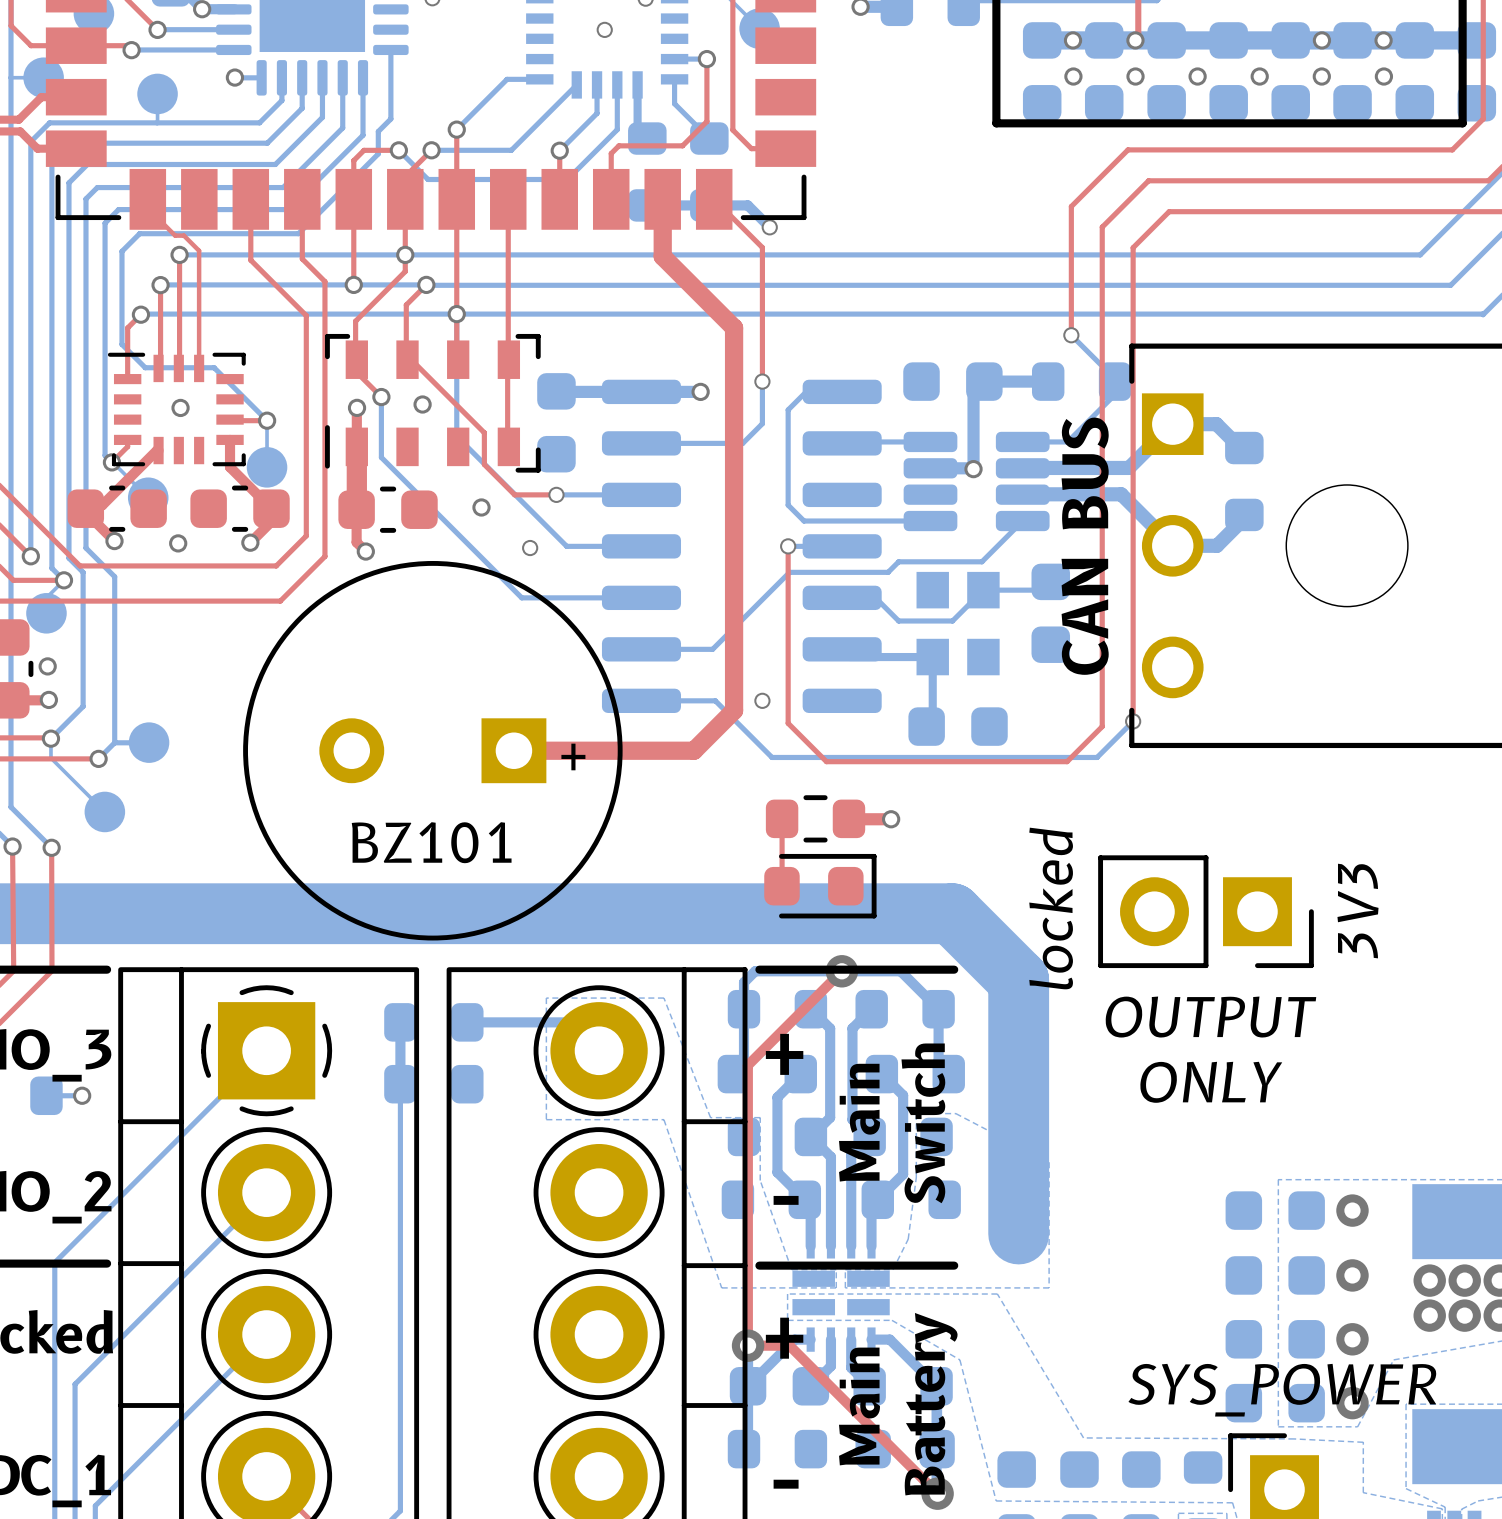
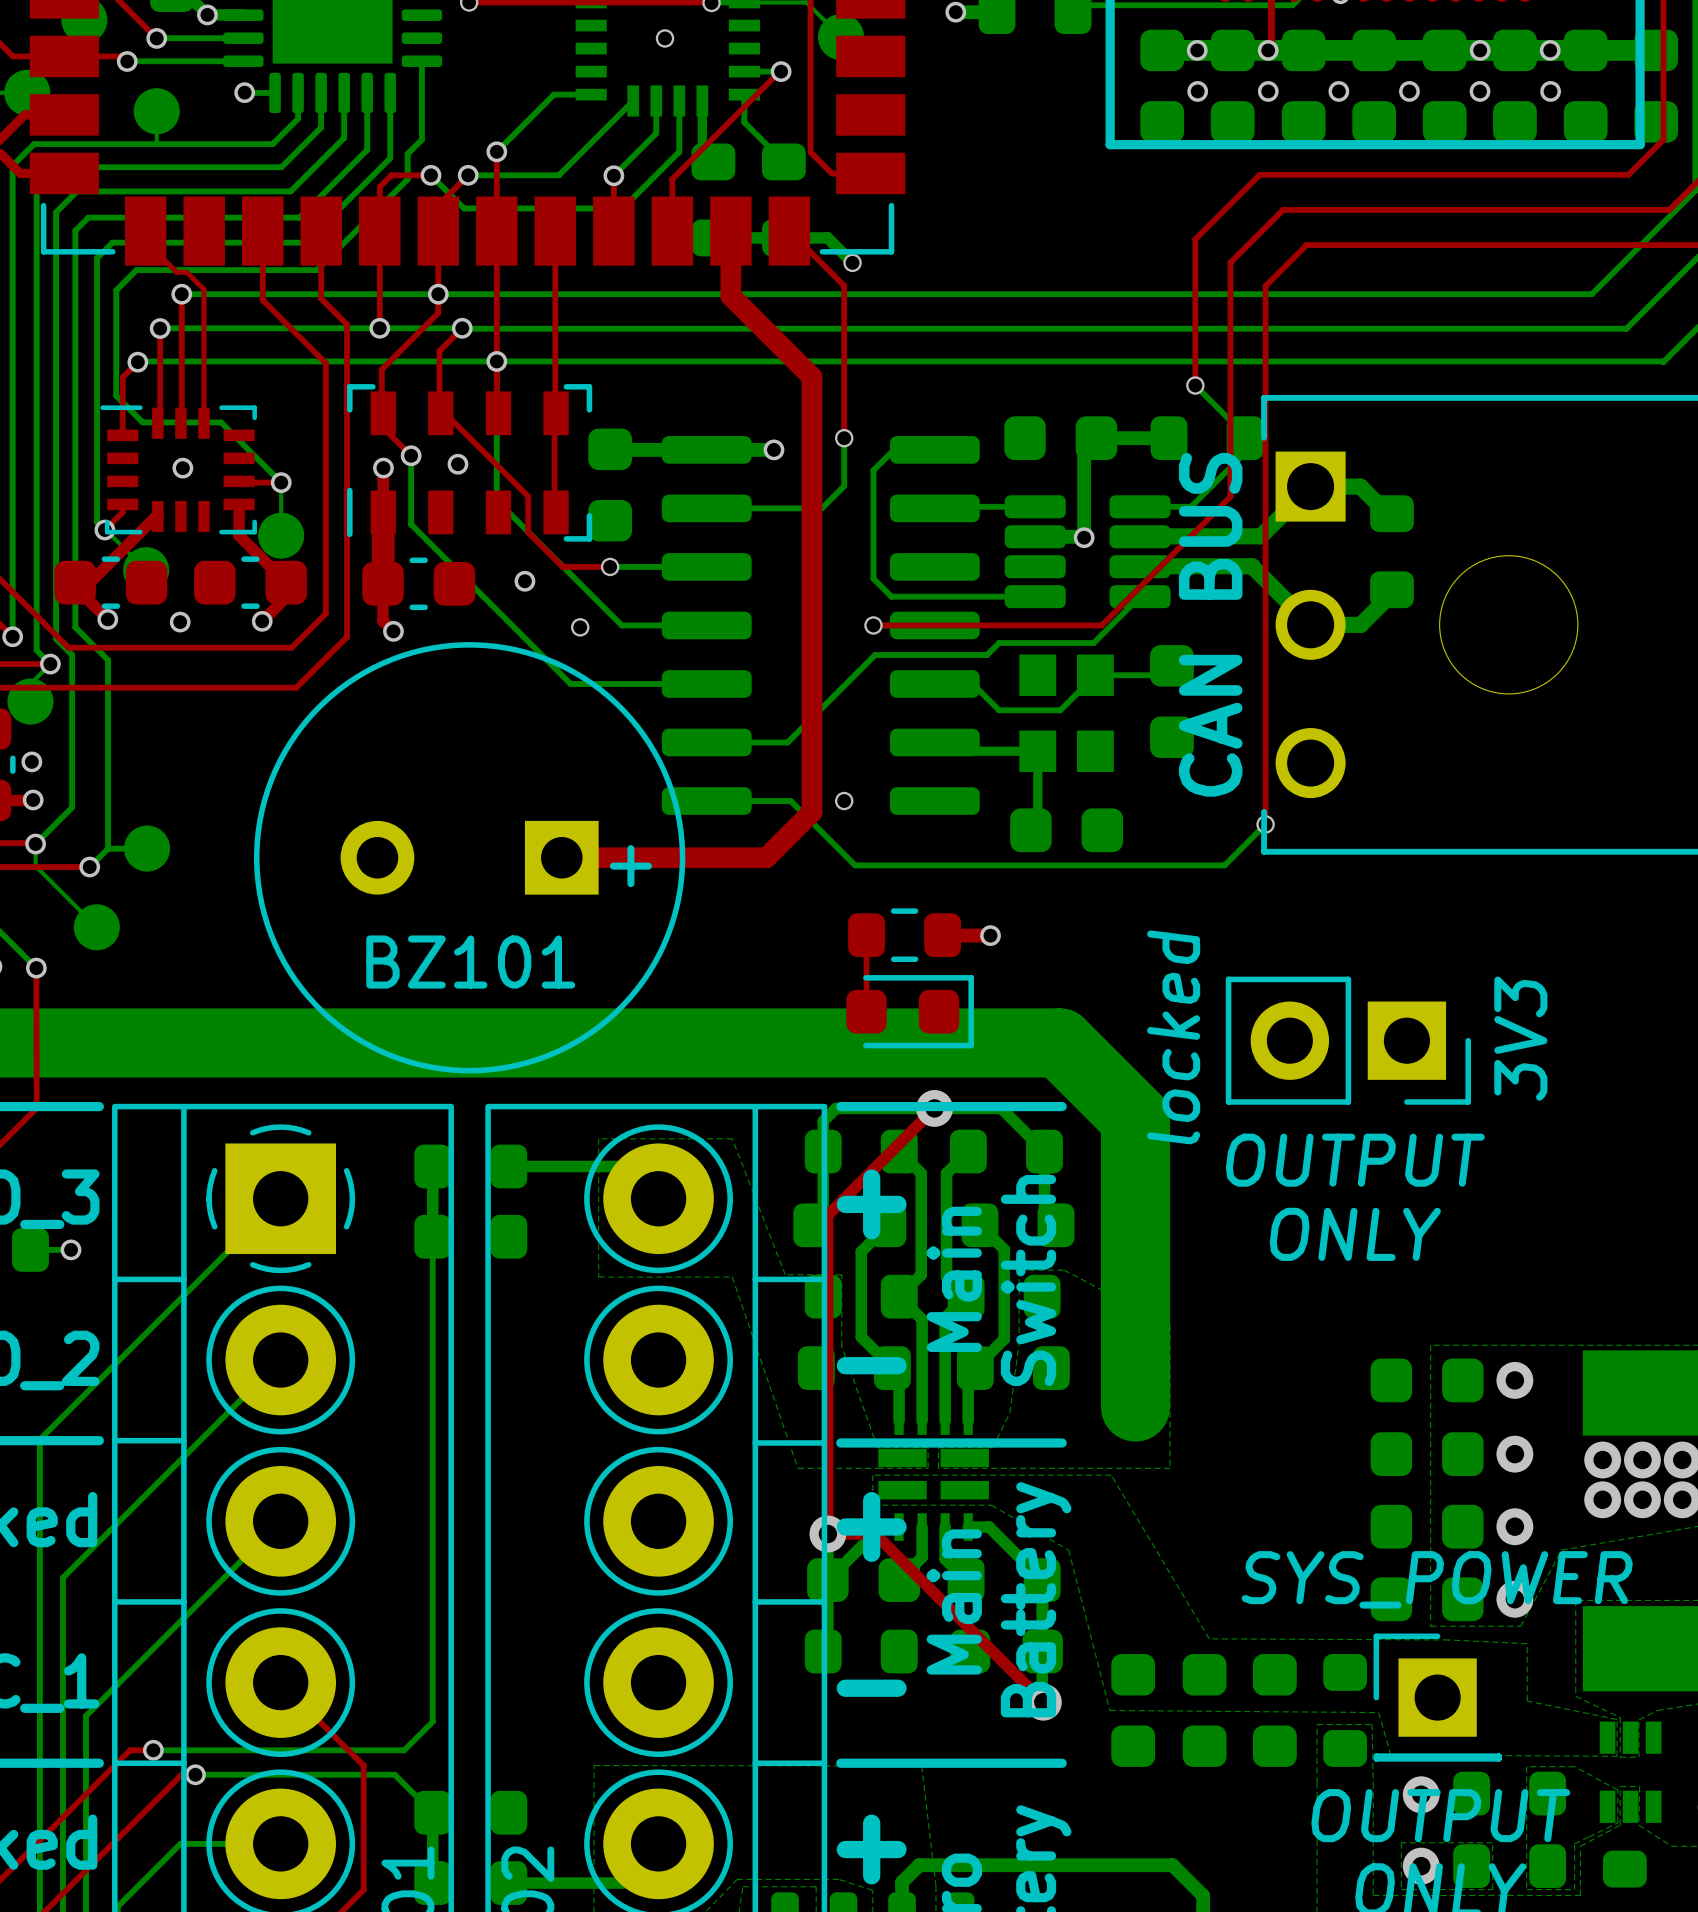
top track: (706, 59) (706, 121) (682, 145) (618, 145) -> (781, 71) (681, 170)
top track: (1102, 433) (1102, 726) (1067, 761) (826, 761) (788, 723) (788, 546) -> (1230, 496) (1101, 625) (873, 625)

